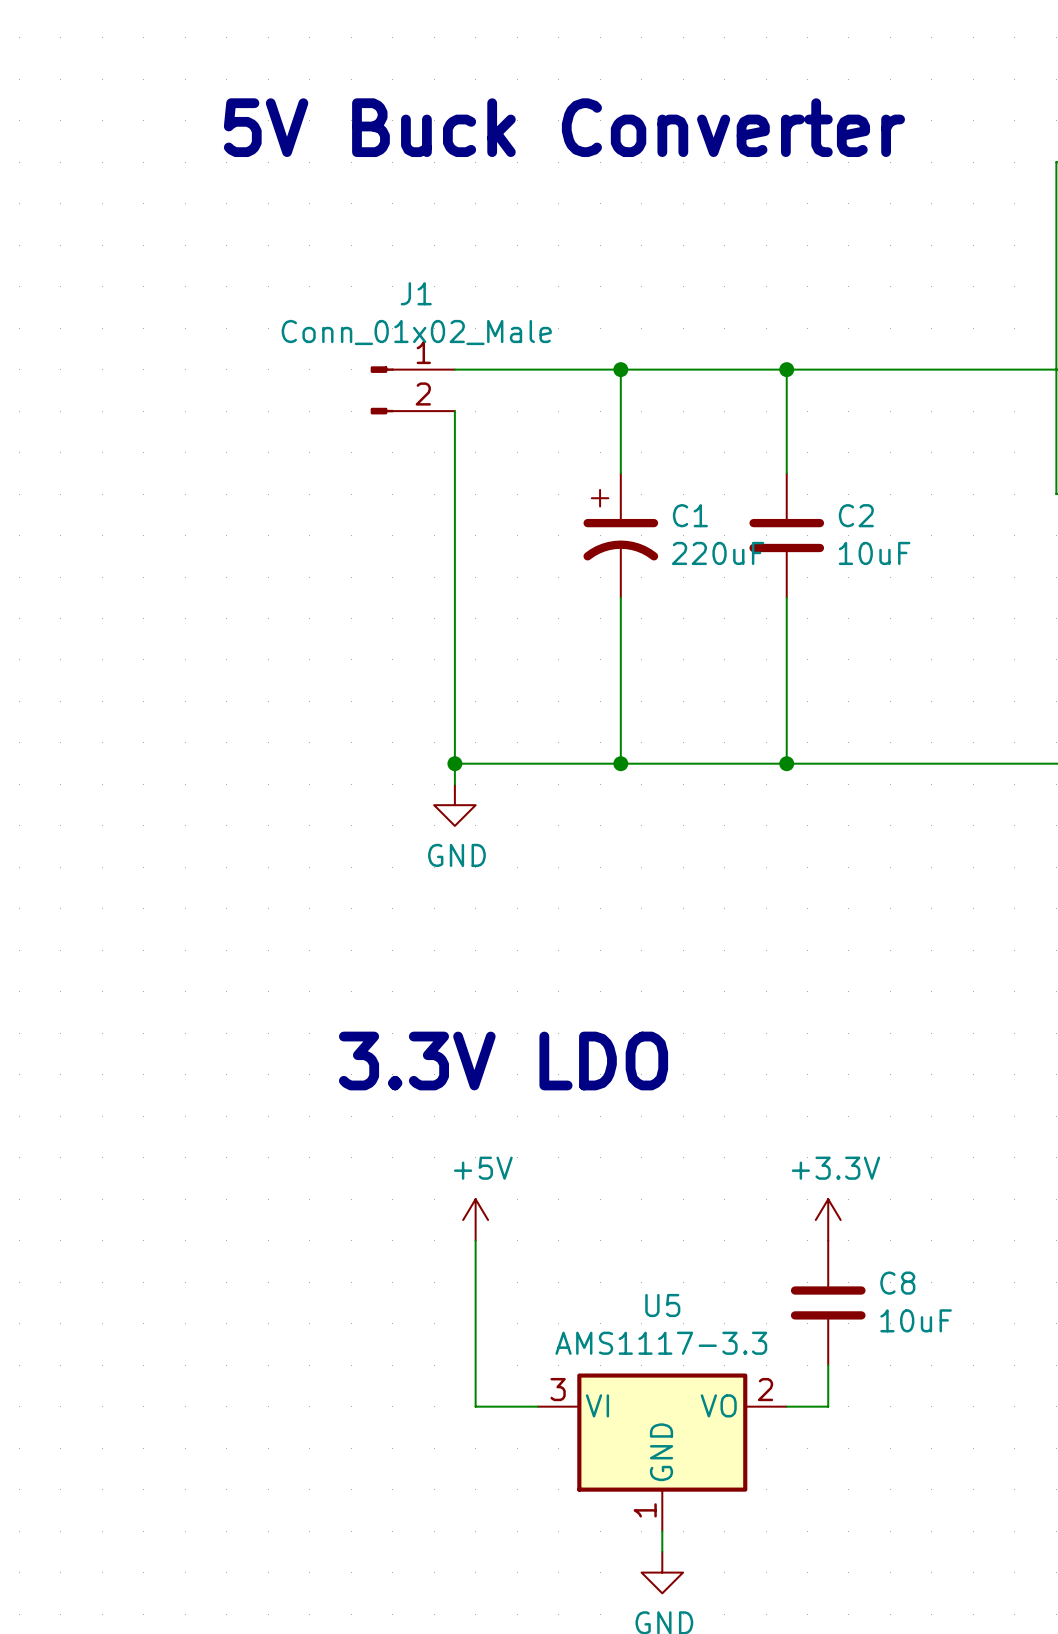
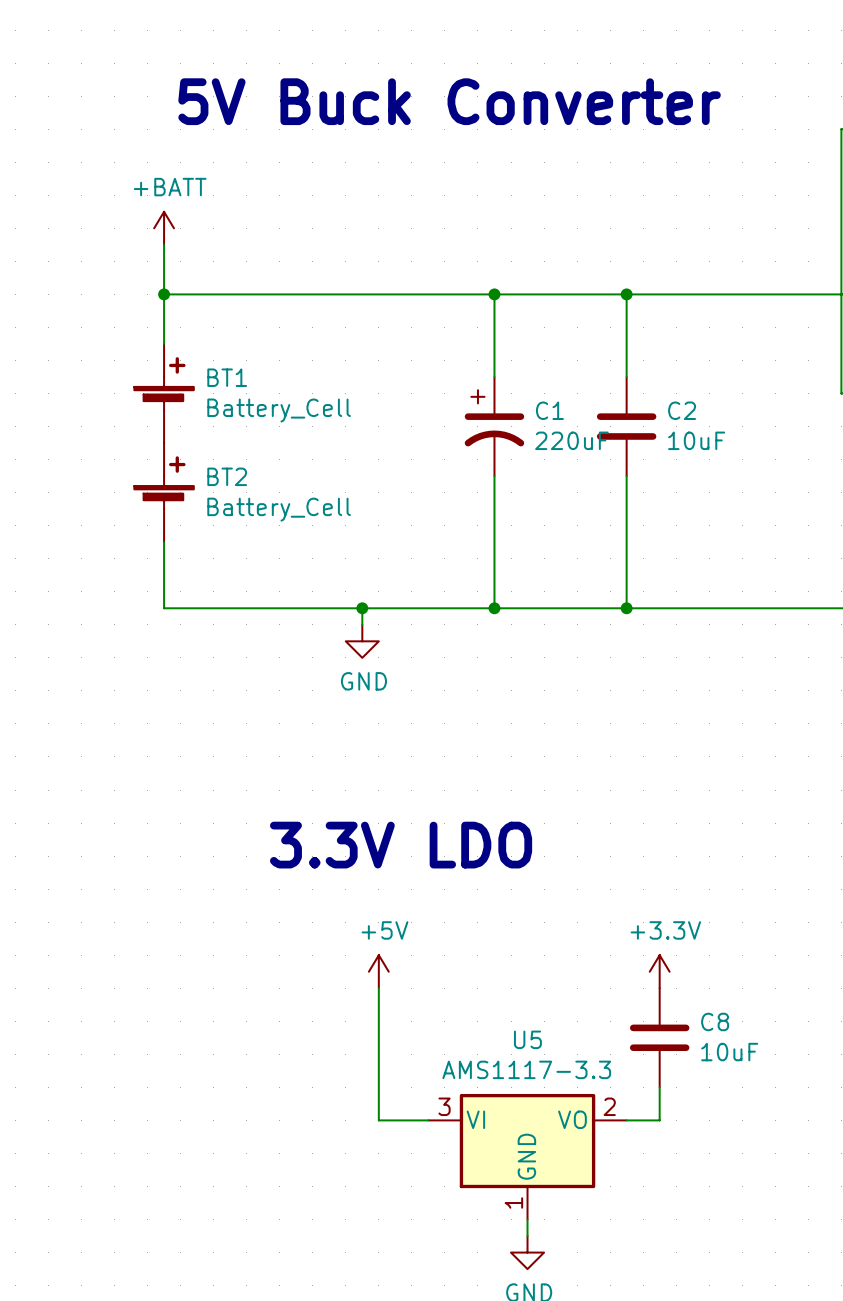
power symbol: none -> +BATT (164, 228)
wire: none -> (164, 244) (164, 343)
wire: none -> (164, 294) (362, 294)
junction: none -> (164, 294)
J1: Conn_01x02_Male (412, 390) -> none
wire: (454, 411) (454, 763) -> (164, 542) (164, 608) (362, 608)
BT1: none -> Battery_Cell (164, 393)
BT2: none -> Battery_Cell (164, 492)

